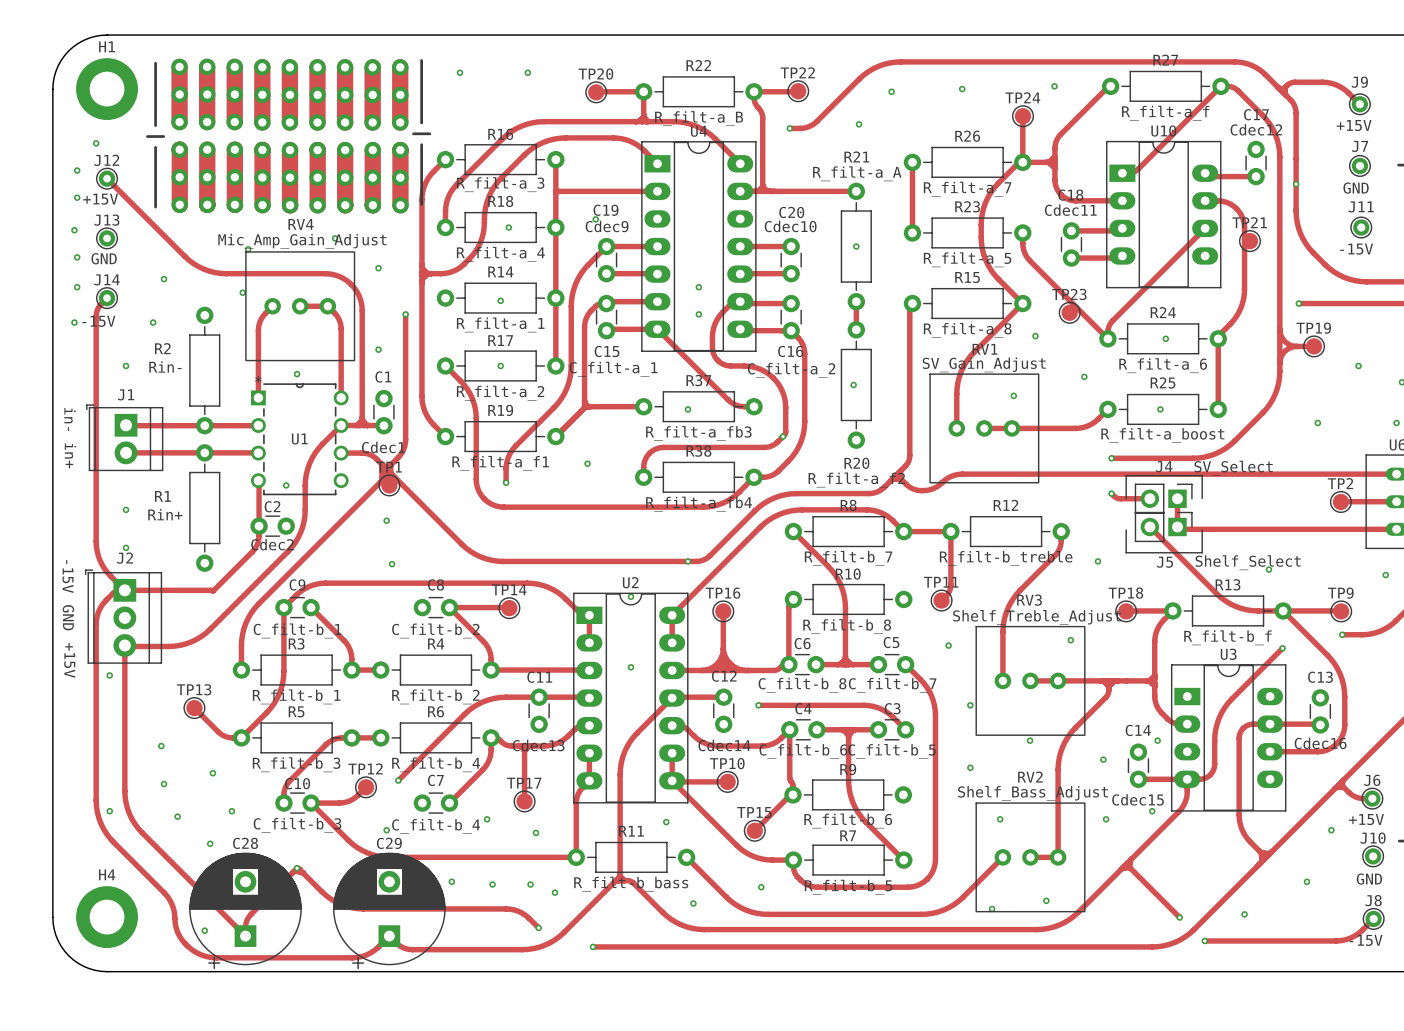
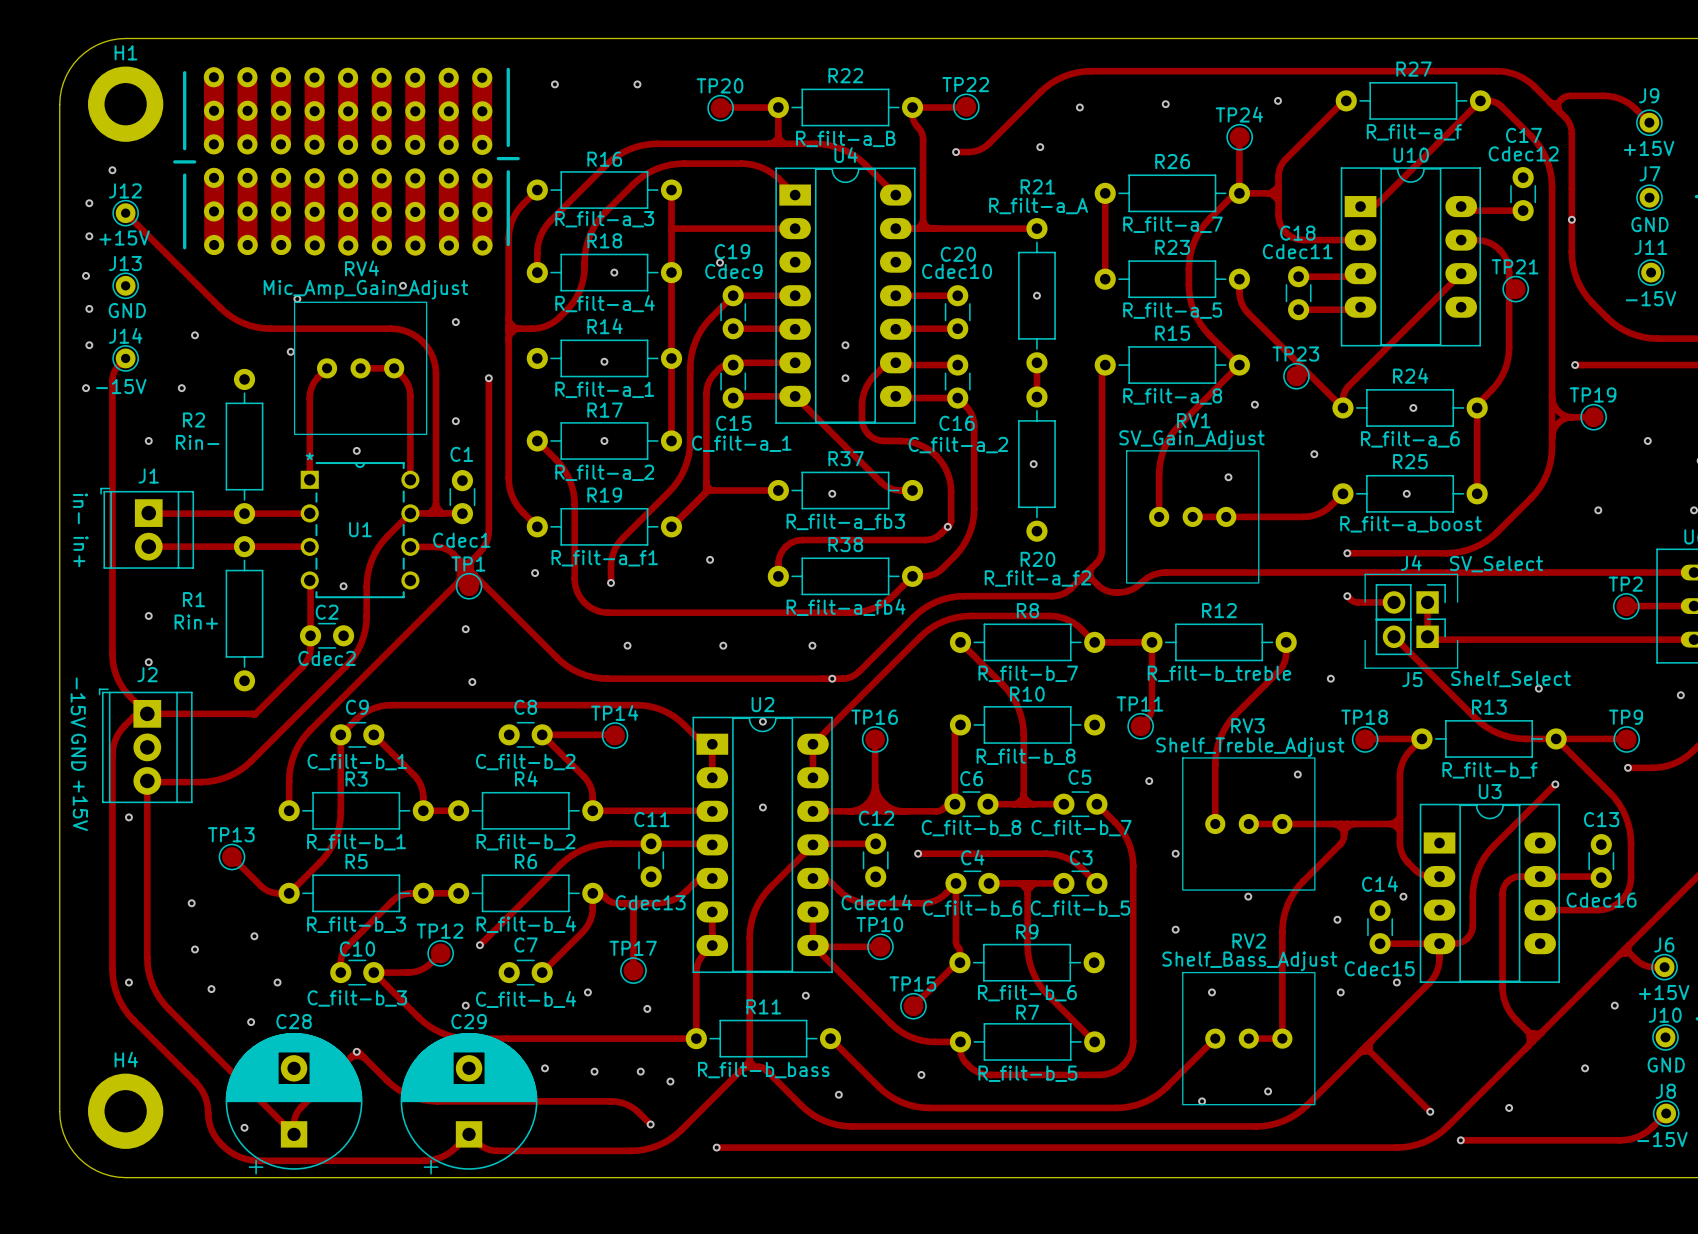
via: none -> (535, 573)
via: none -> (627, 645)
via: none -> (723, 645)
via: none -> (812, 645)

